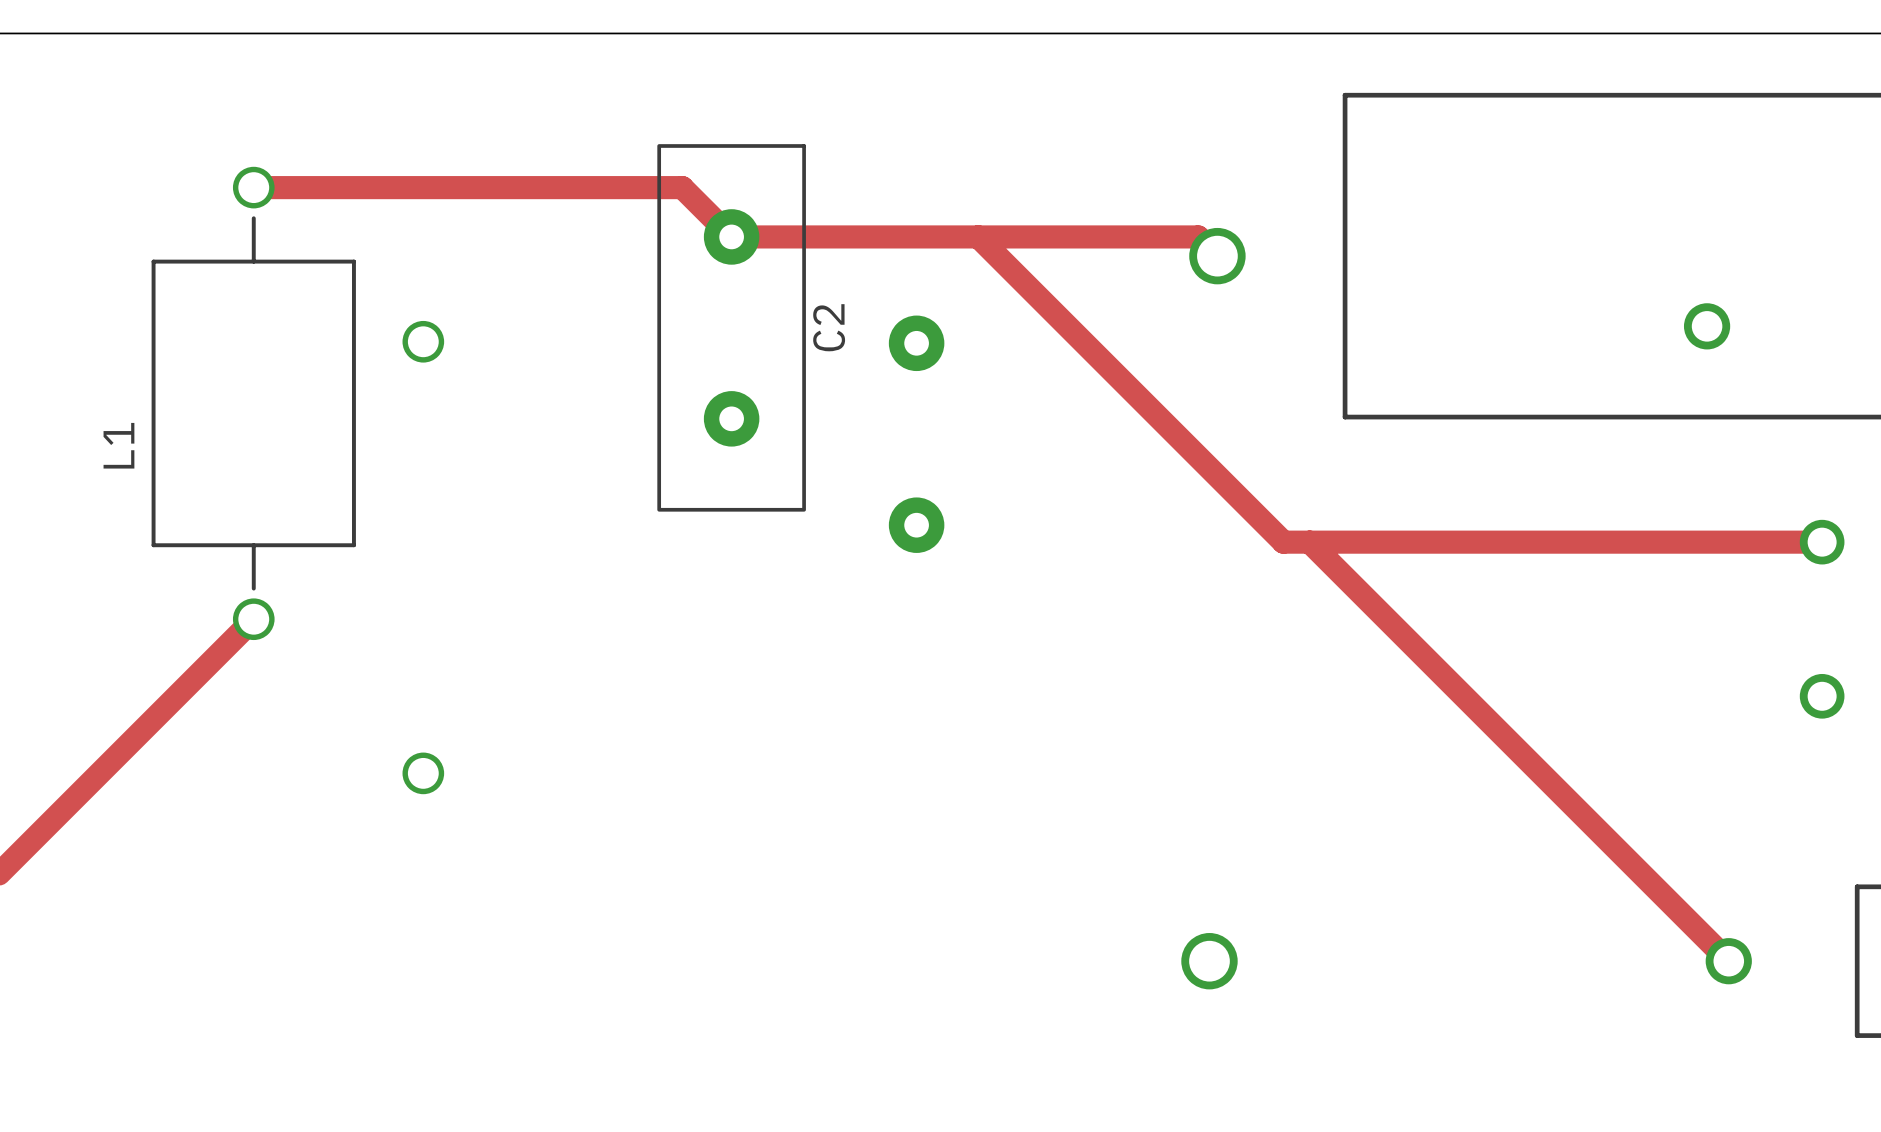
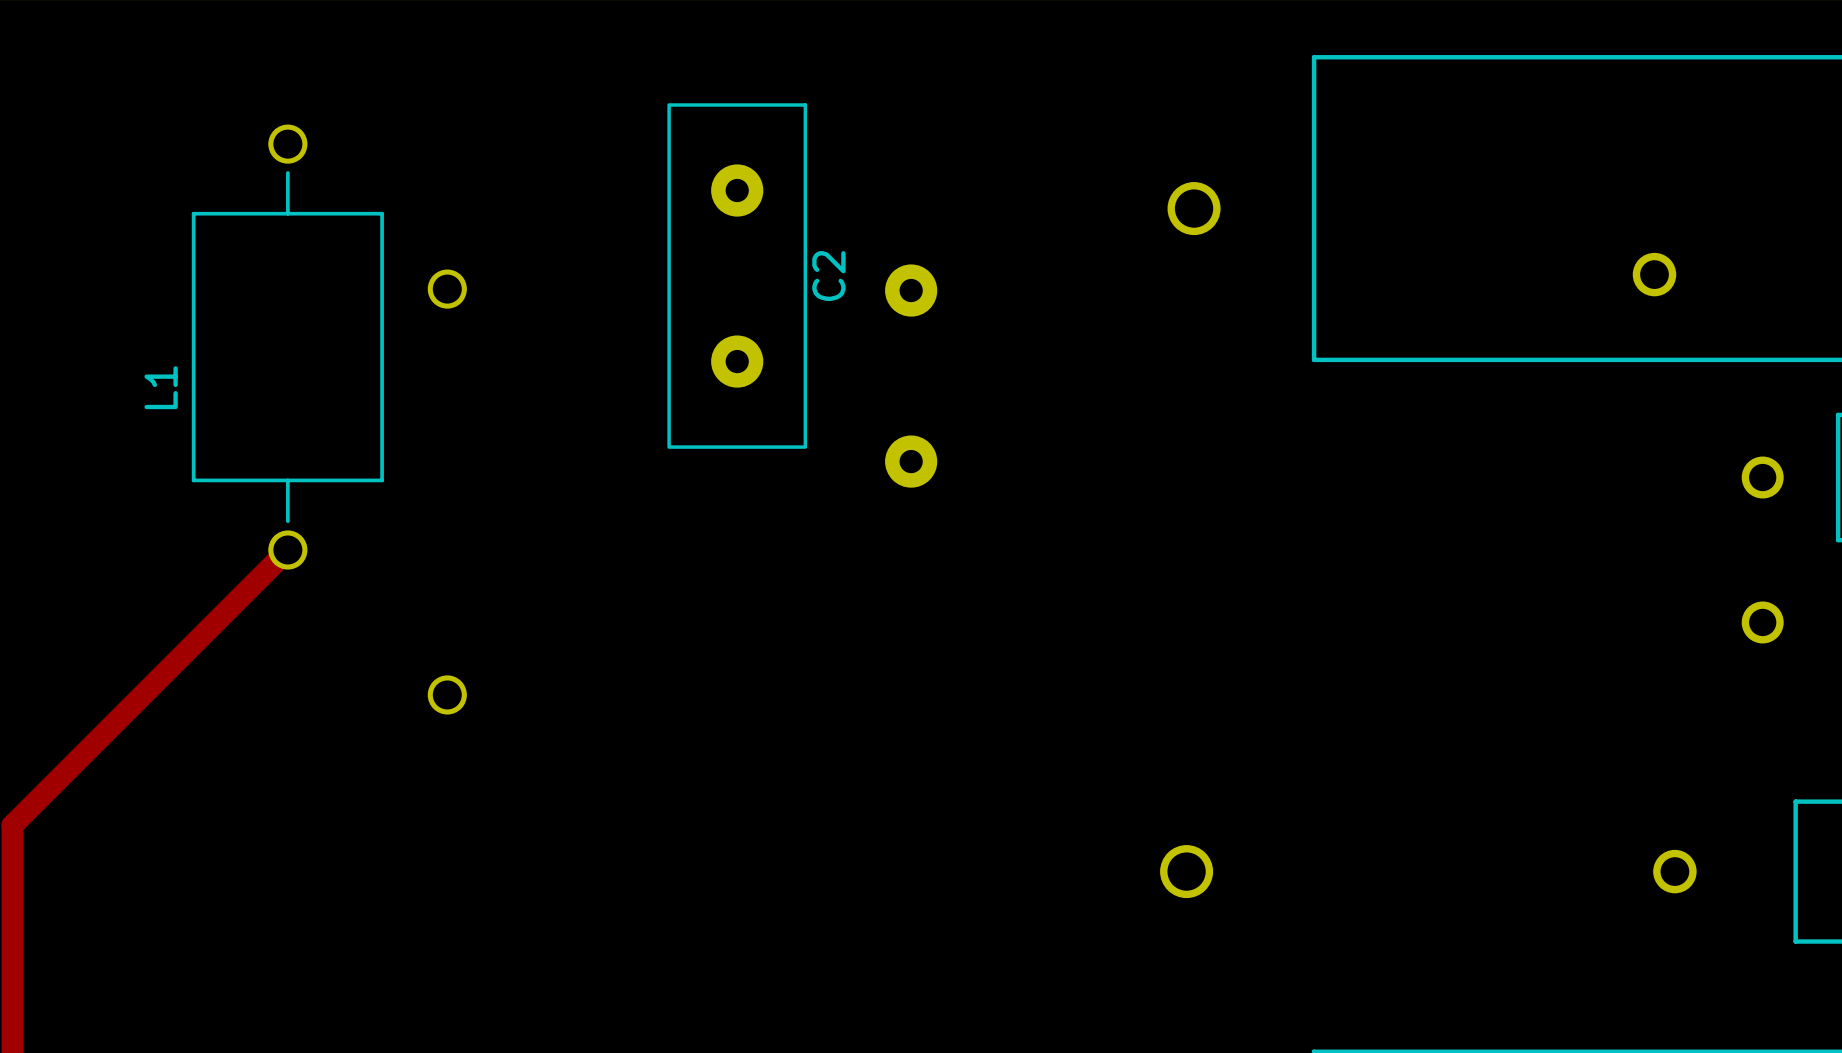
track: (253, 187) (682, 187) (731, 236) (1198, 236) (1217, 256) -> none
track: (978, 236) (1283, 542) (1822, 542) -> none
track: (1309, 542) (1728, 961) -> none

